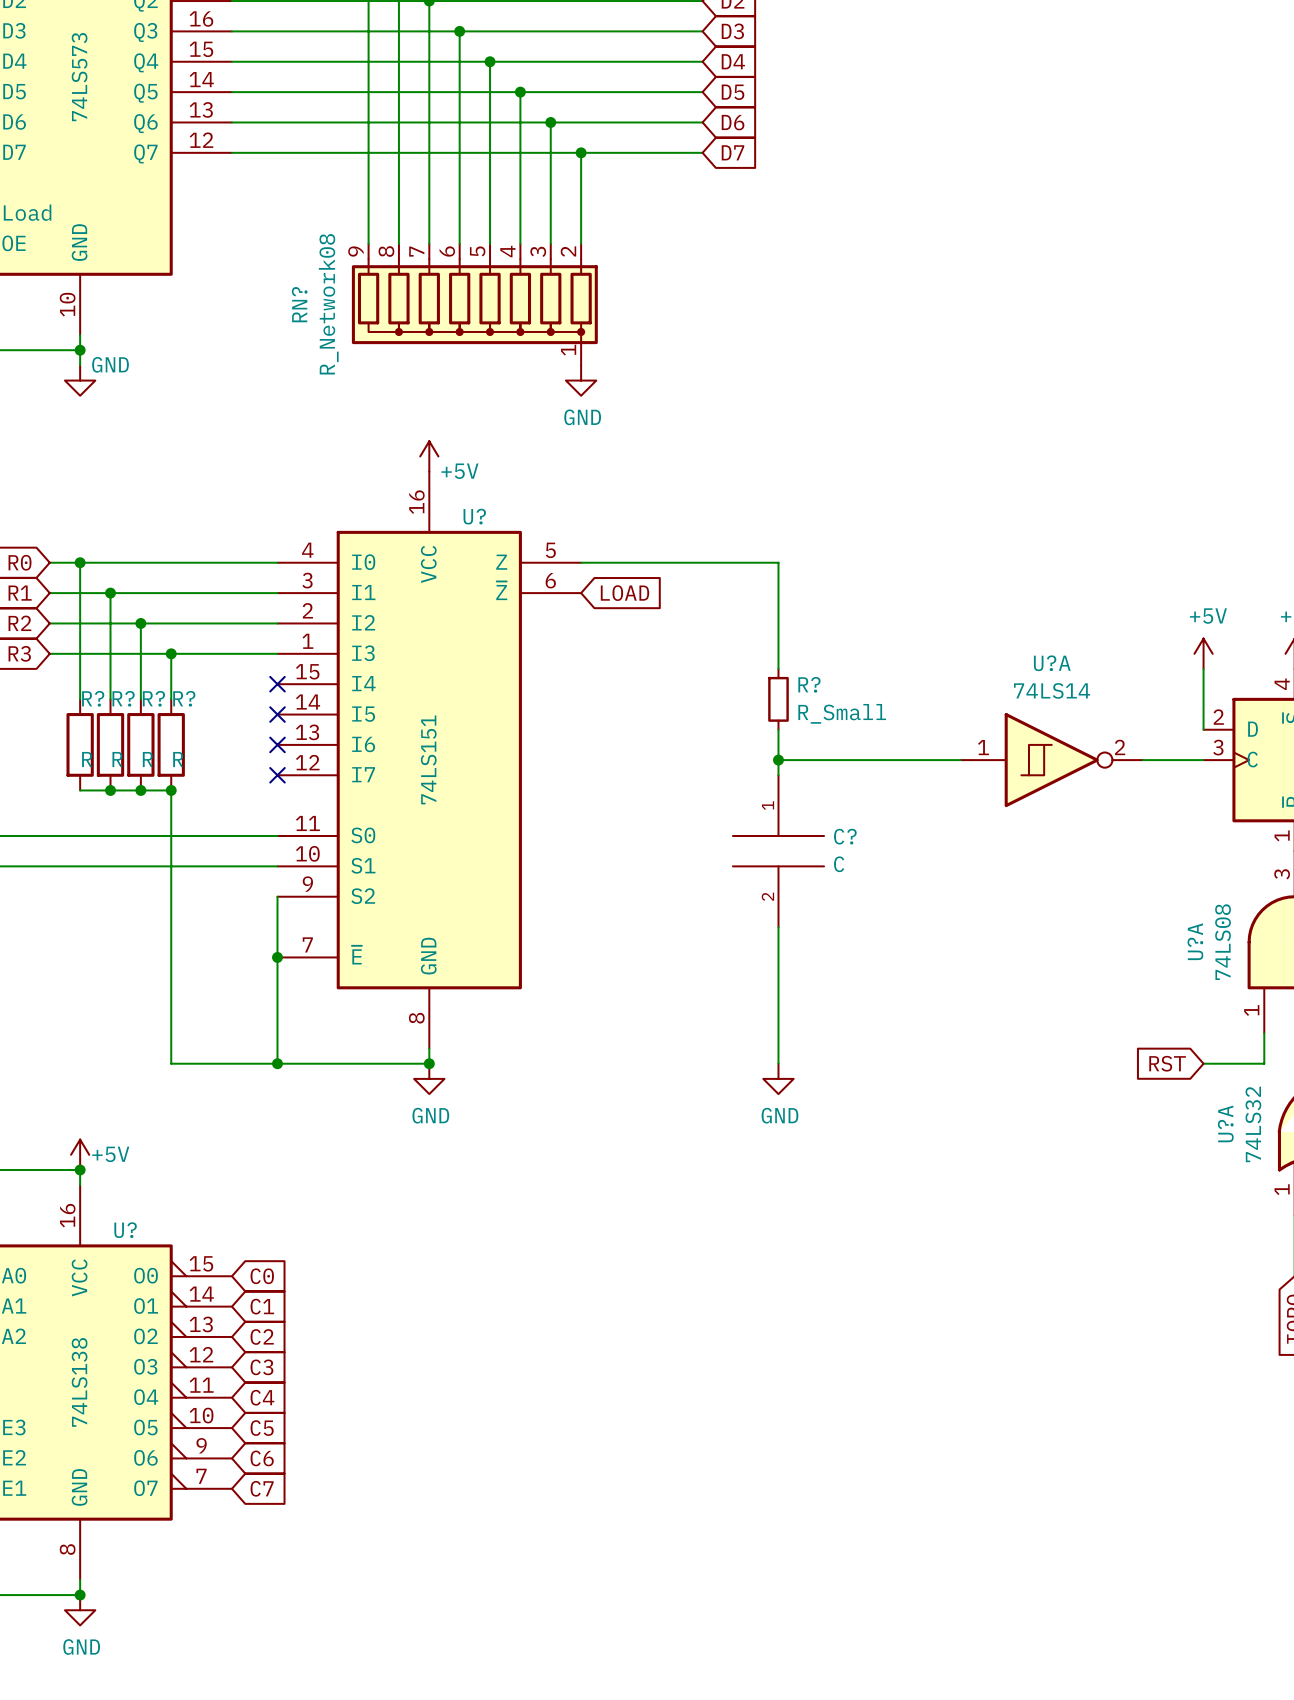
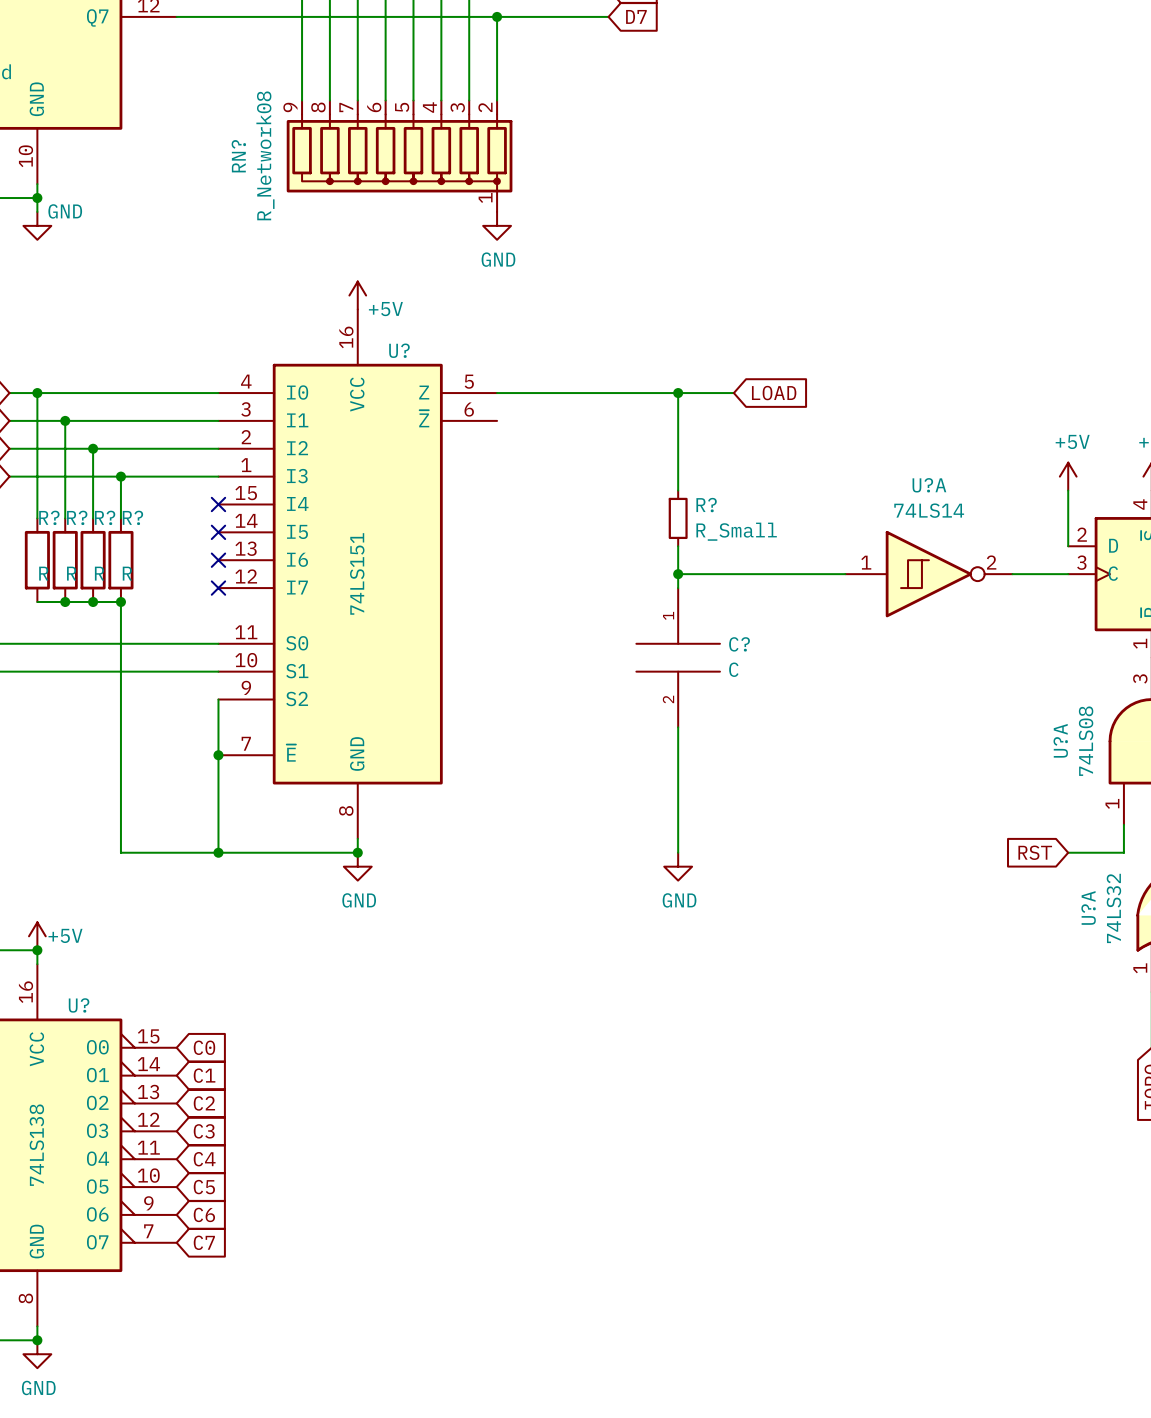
wire: none -> (678, 393) (733, 393)
junction: none -> (678, 393)
global label position: LOAD (625, 593) -> LOAD (774, 393)

